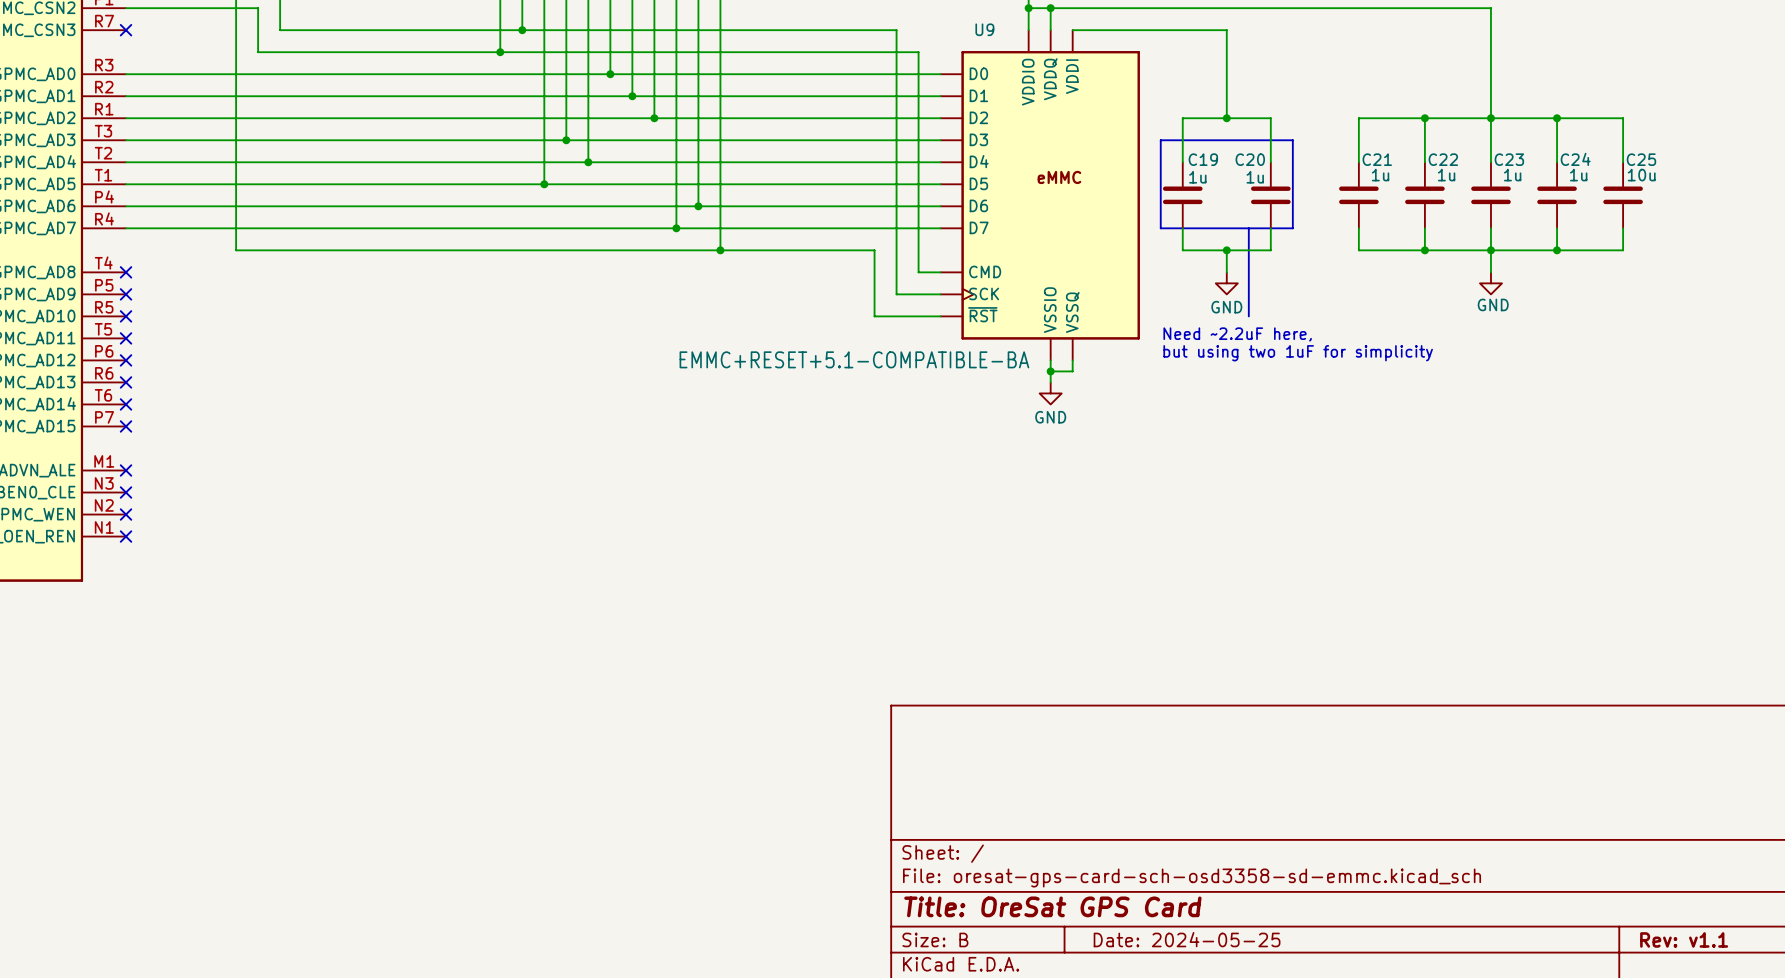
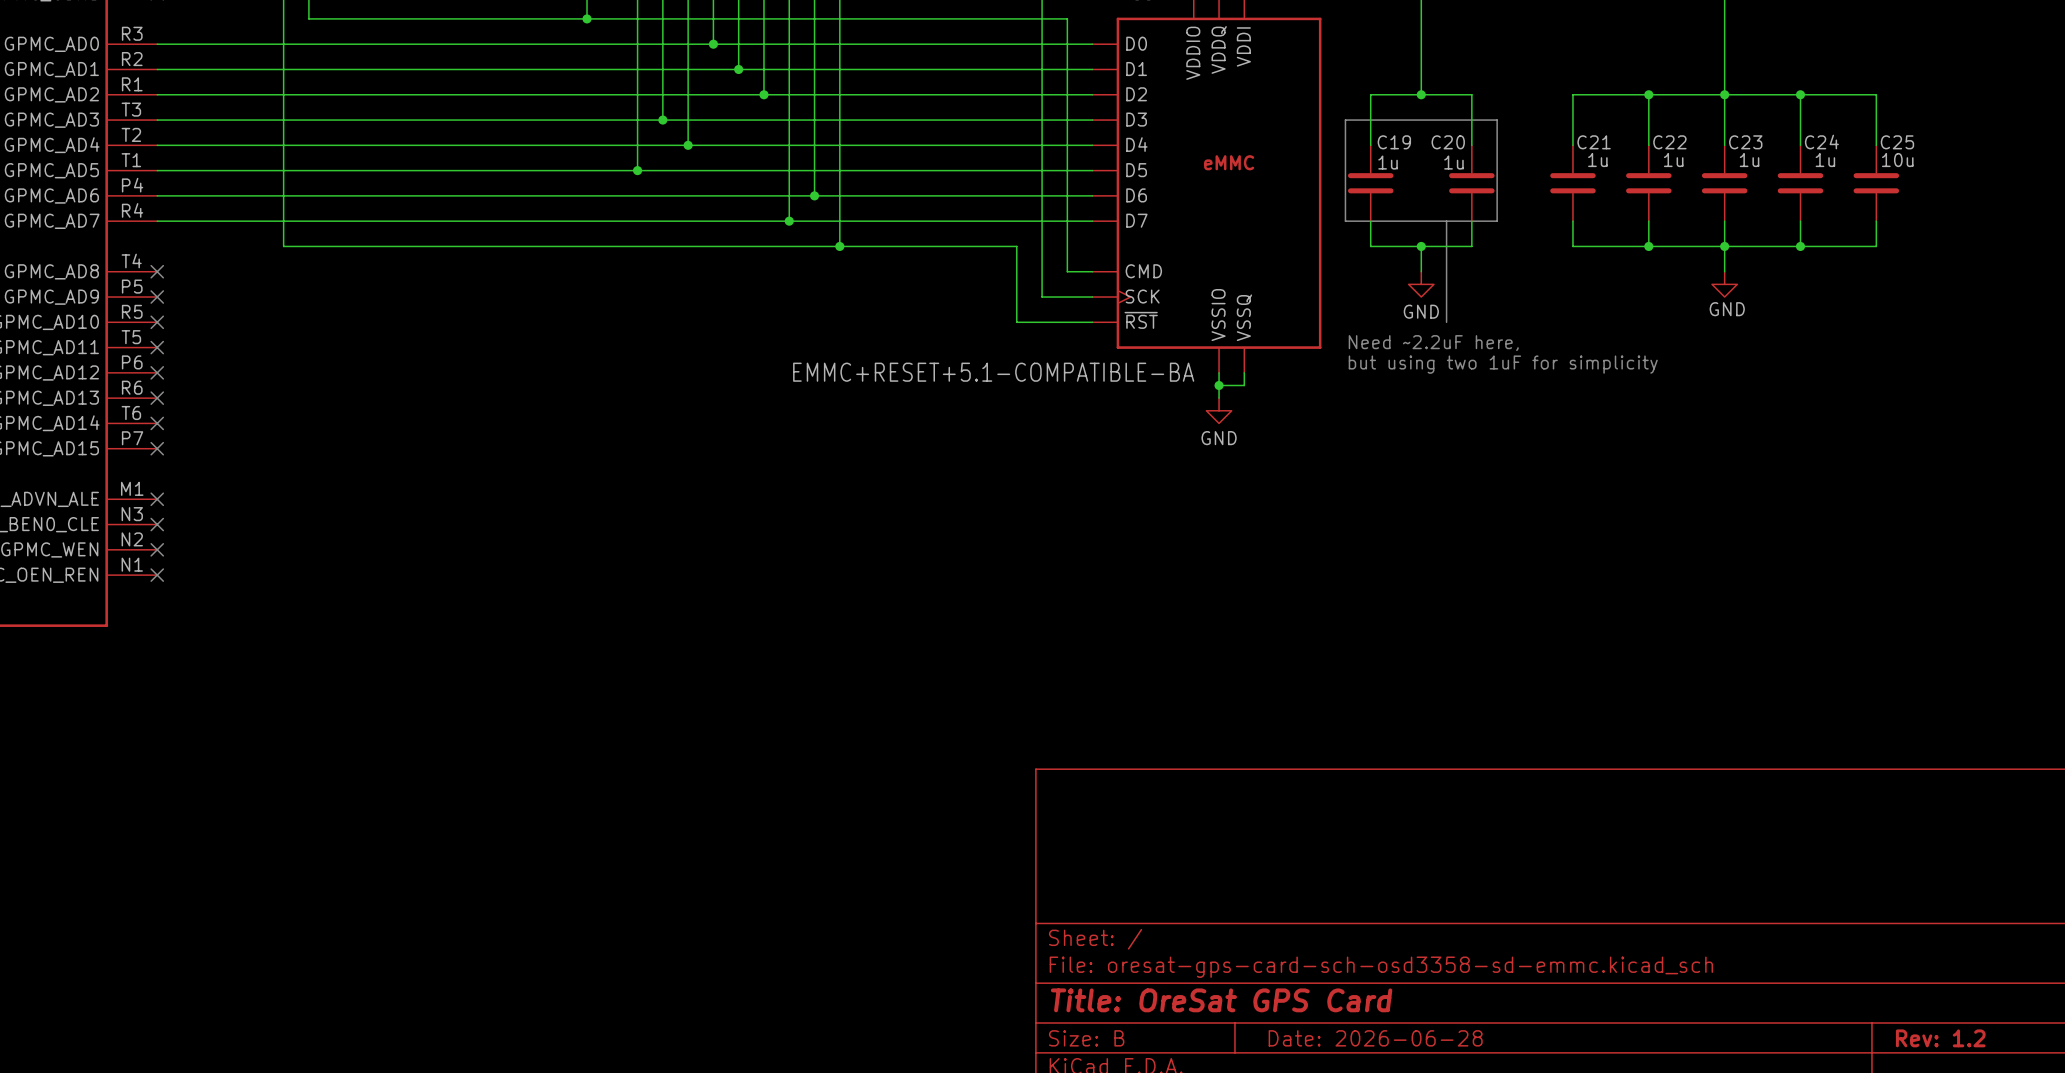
title block: Date: 2024-05-25 (1187, 939) -> Date: 2026-06-28 (1375, 1038)
title block: Rev: v1.1 (1684, 939) -> Rev: 1.2 (1940, 1038)

